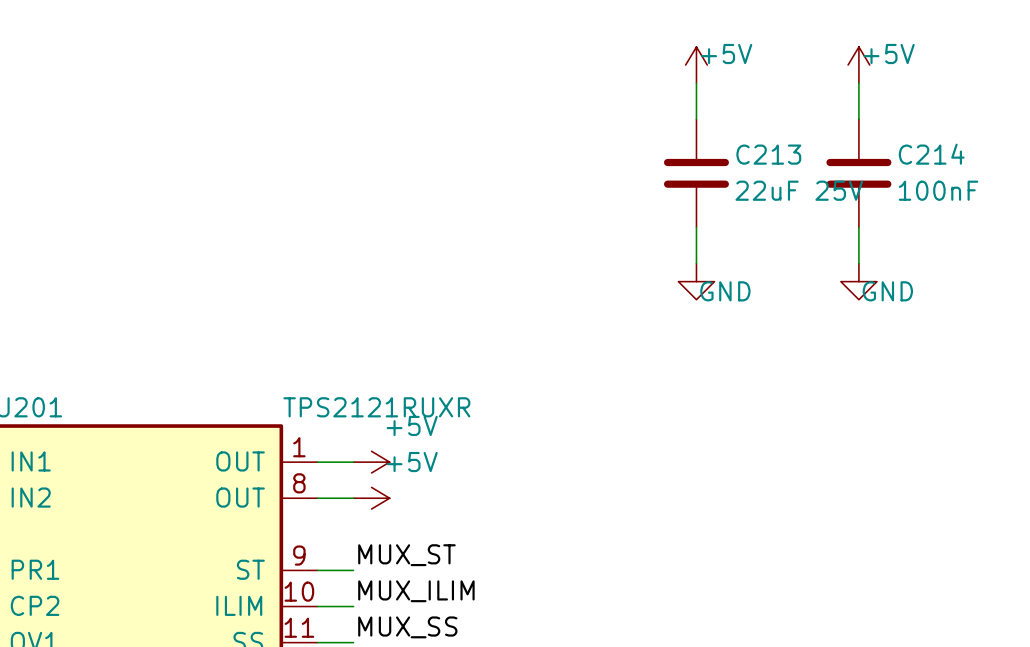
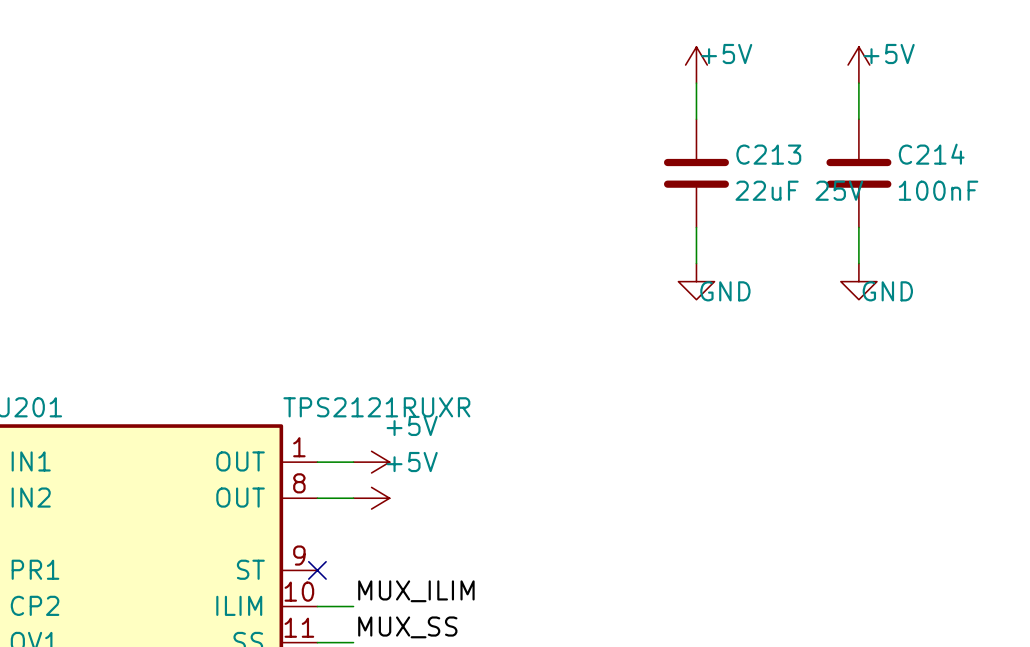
label: MUX_ST (406, 555) -> none
wire: (317, 570) (353, 570) -> none
no-connect mark: none -> (317, 570)

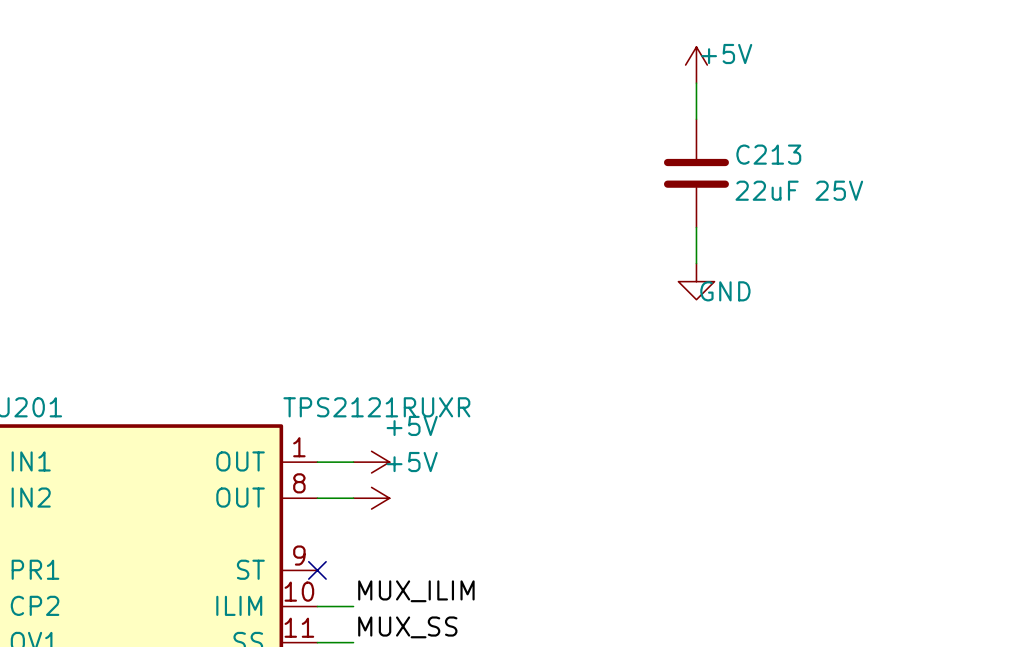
power symbol: +5V (858, 65) -> none
wire: (858, 83) (858, 119) -> none
C214: 100nF (858, 173) -> none
wire: (858, 227) (858, 263) -> none
power symbol: GND (858, 281) -> none

